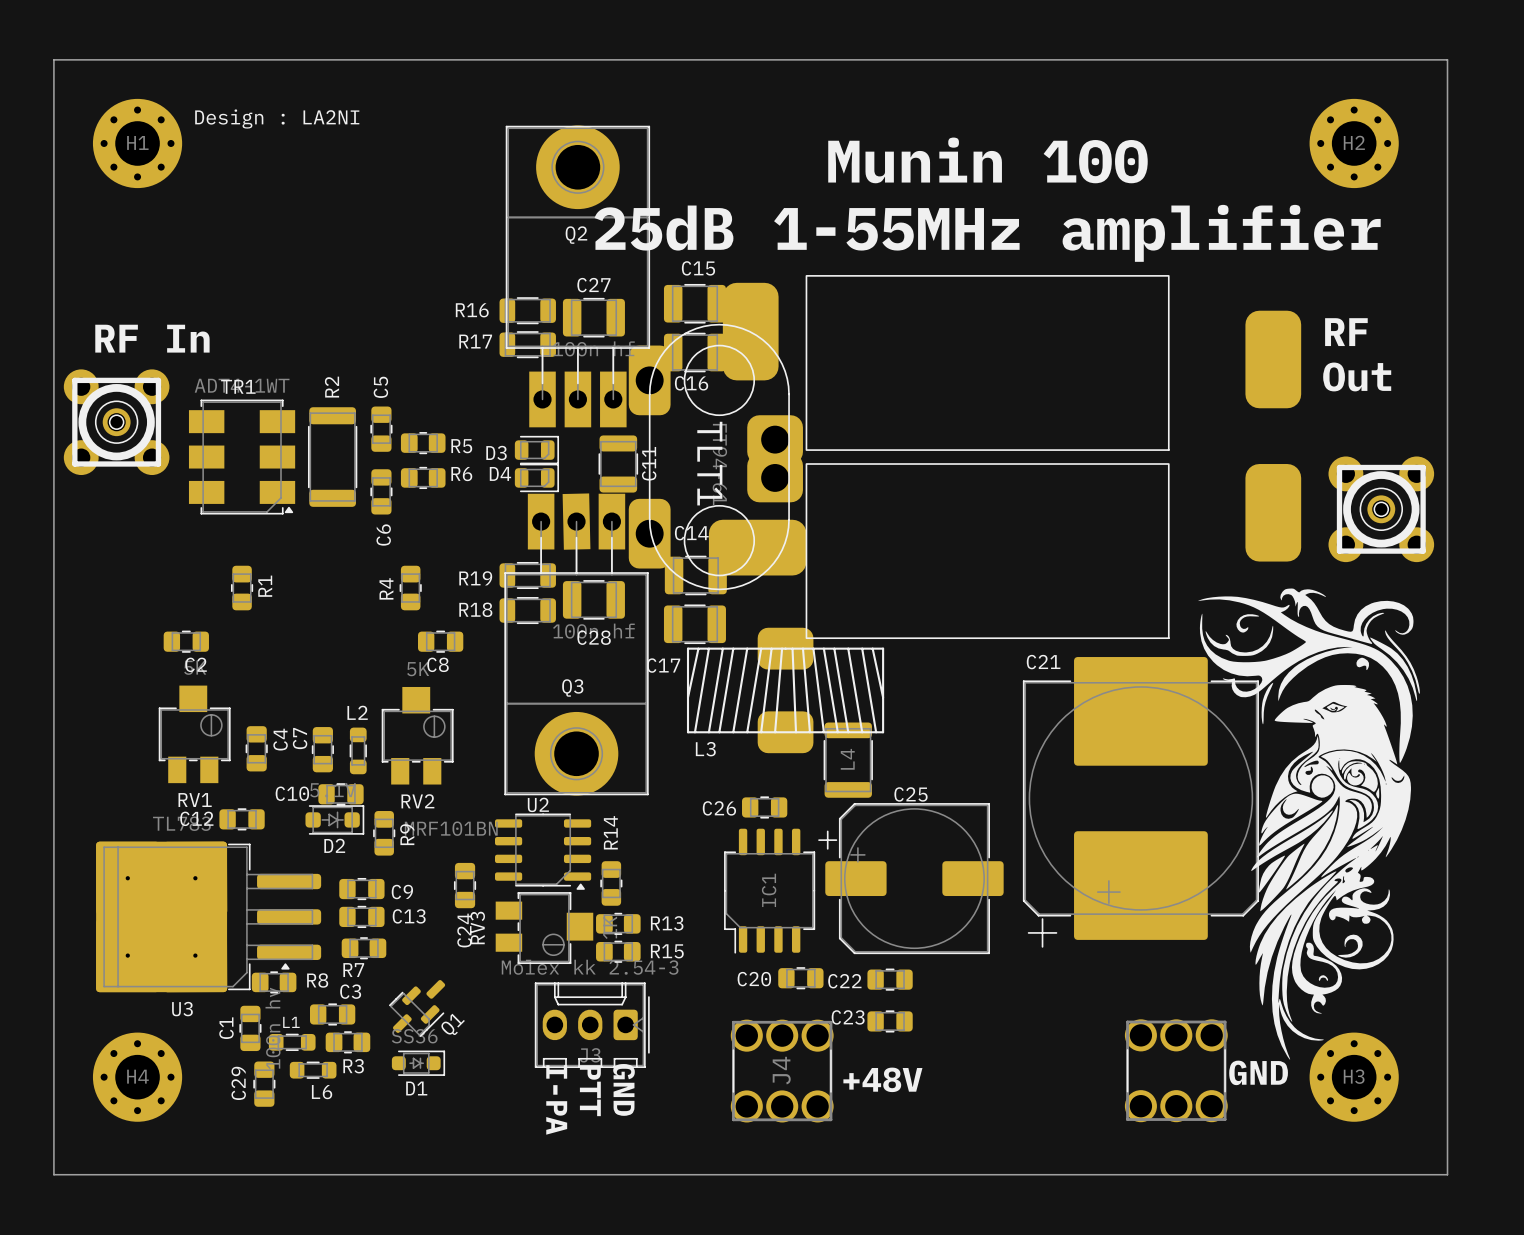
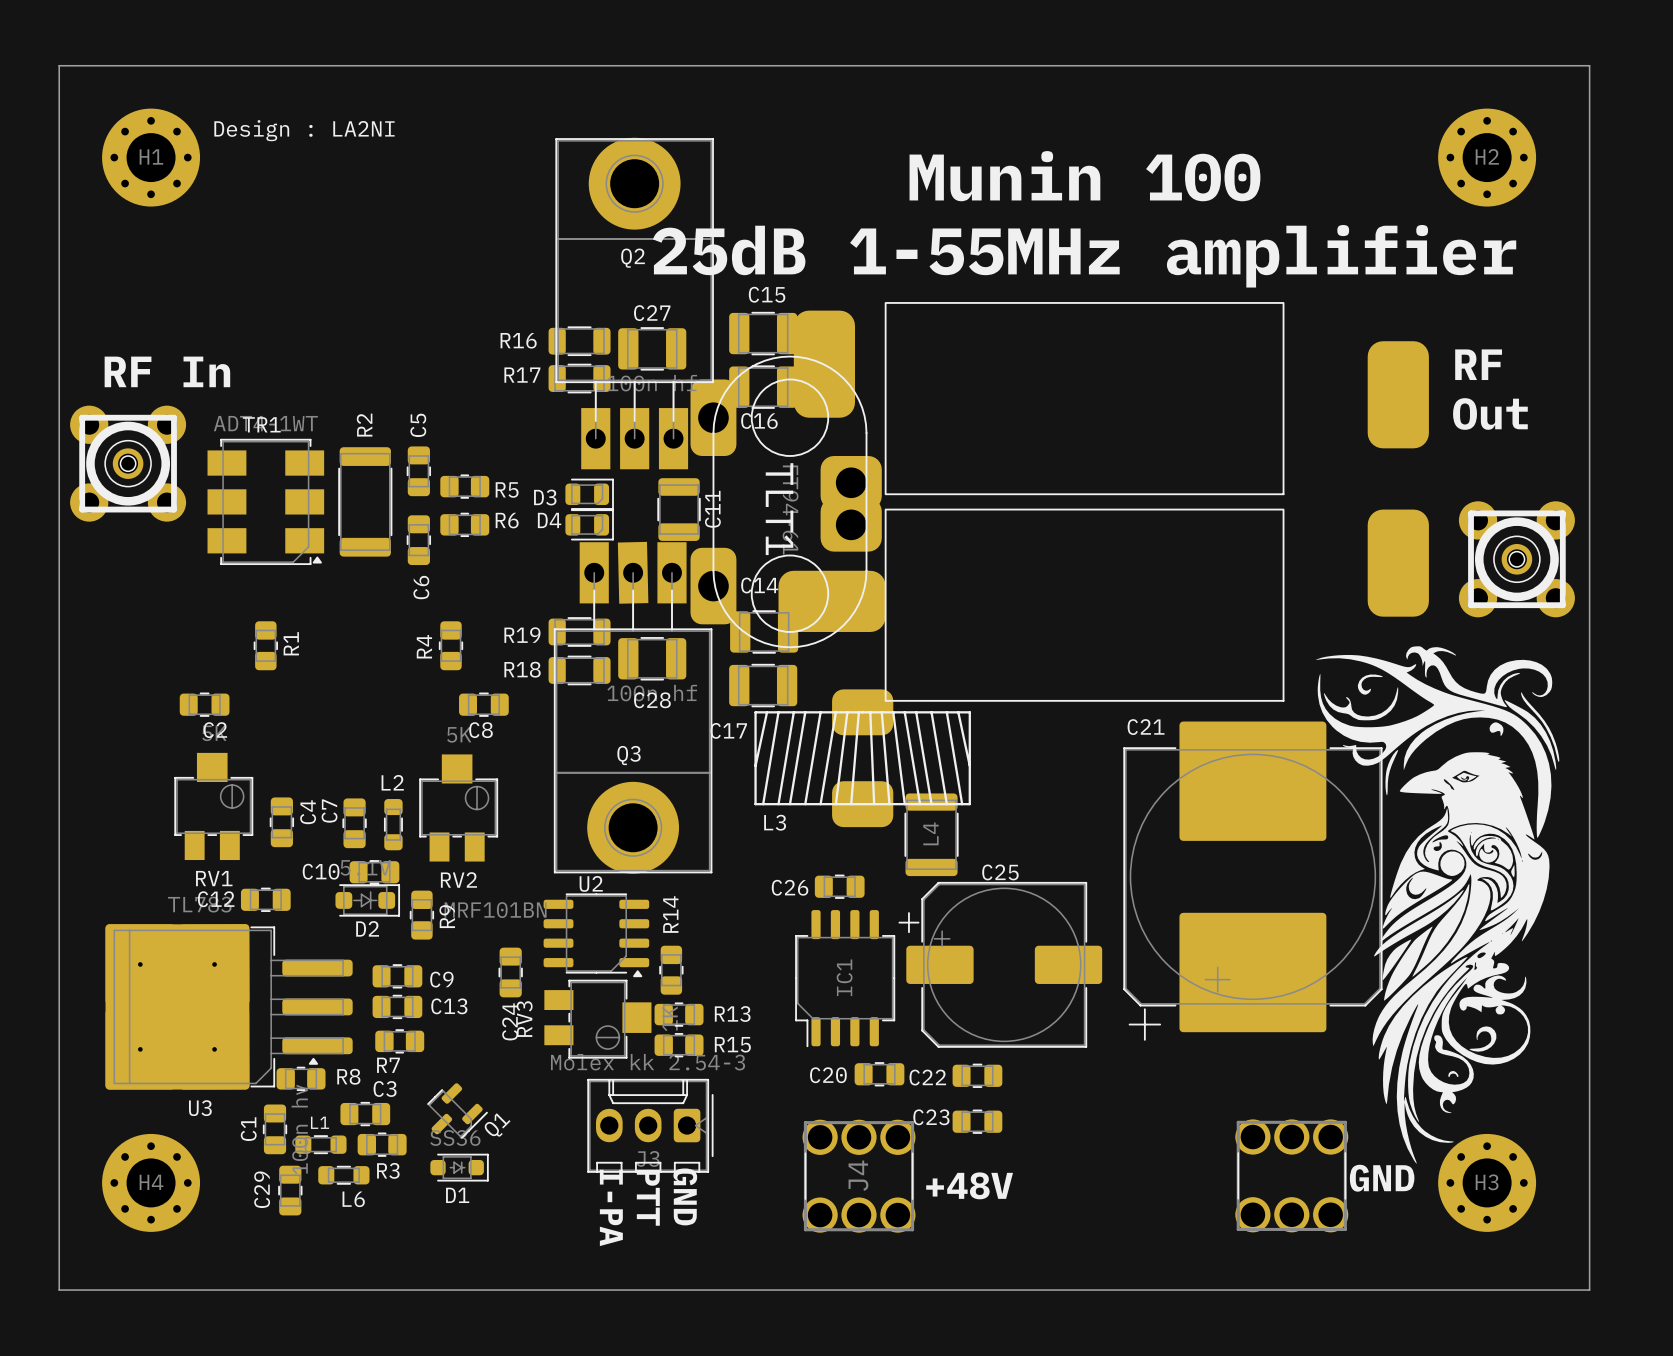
part: (435, 989) -> none

